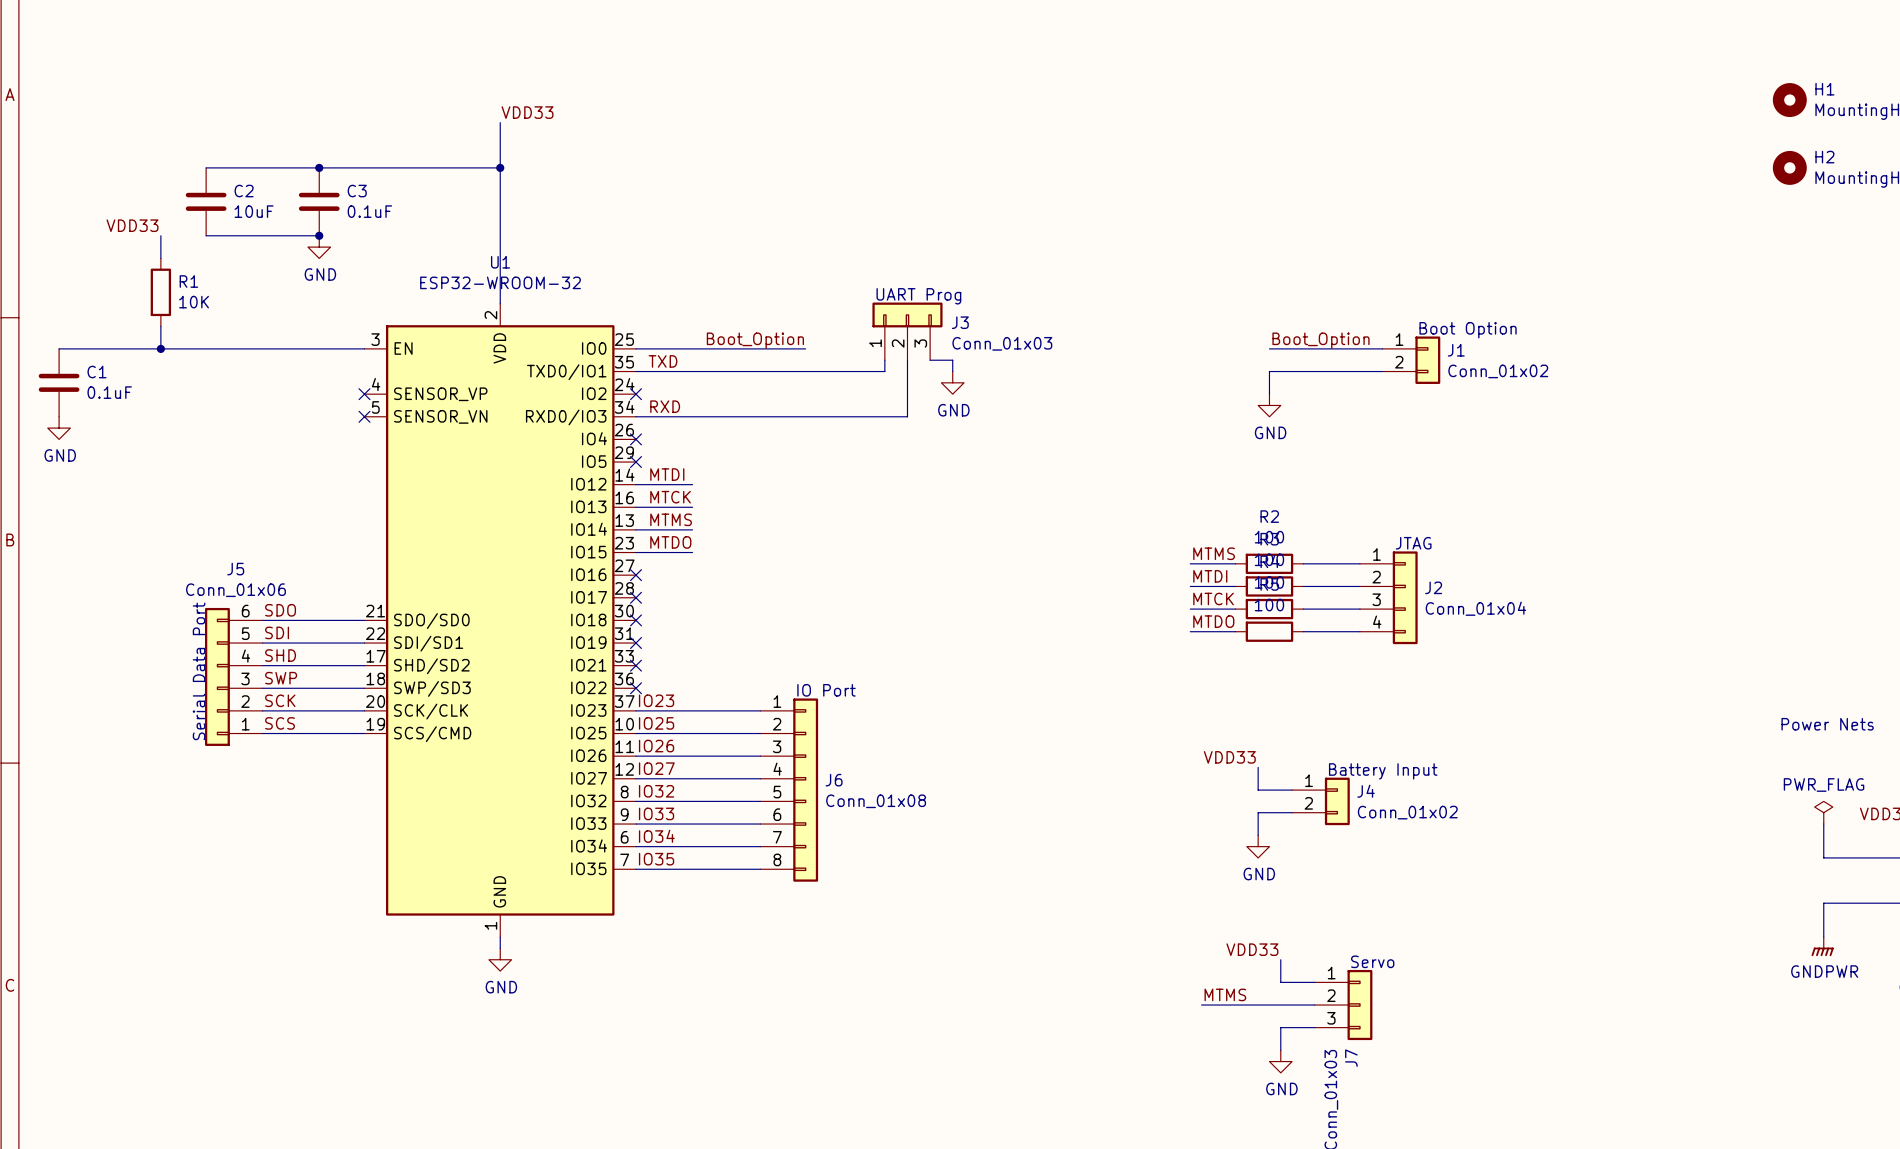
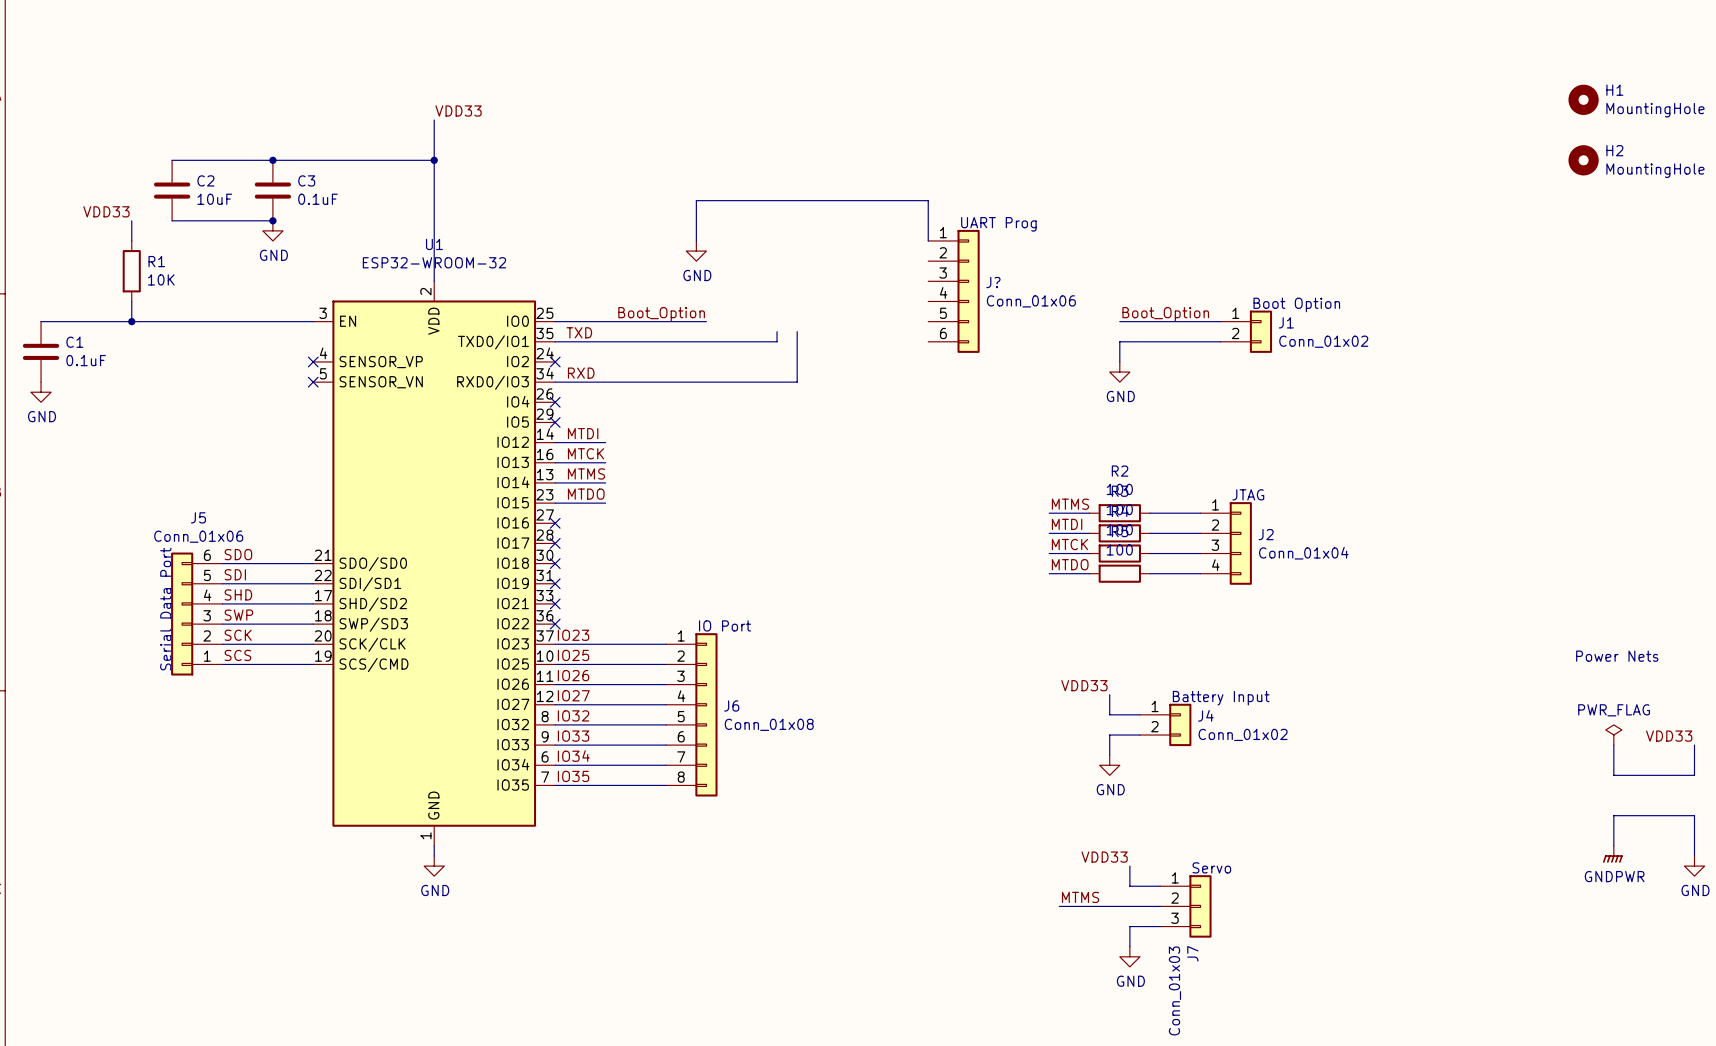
wire: none -> (696, 240) (696, 200) (928, 200) (928, 240)
text position: UART Prog (918, 296) -> UART Prog (998, 224)
J?: none -> Conn_01x06 (953, 291)
J3: Conn_01x03 (907, 331) -> none
wire: (930, 360) (952, 360) (952, 371) -> none
power symbol position: GND (952, 382) -> GND (696, 251)

